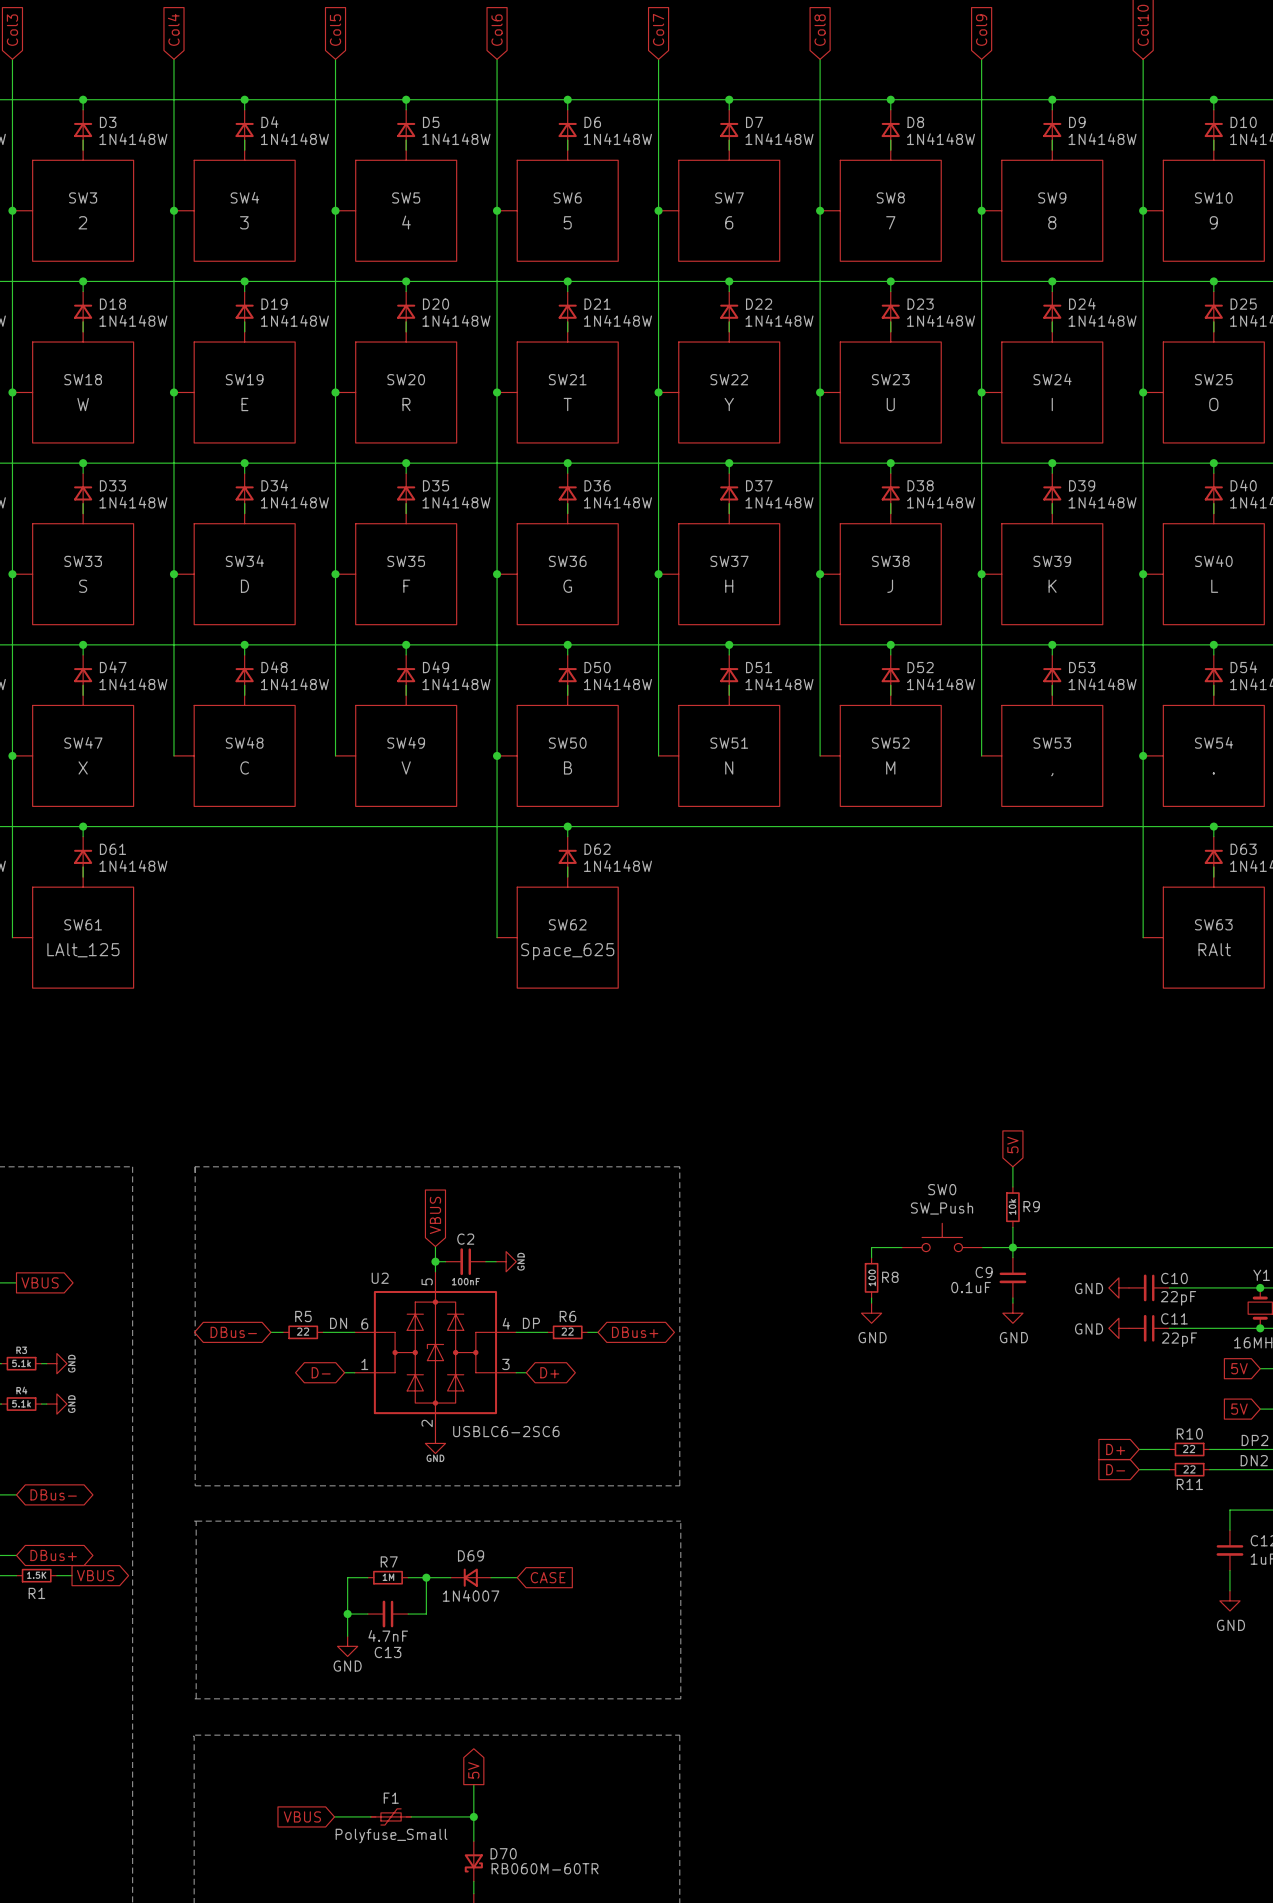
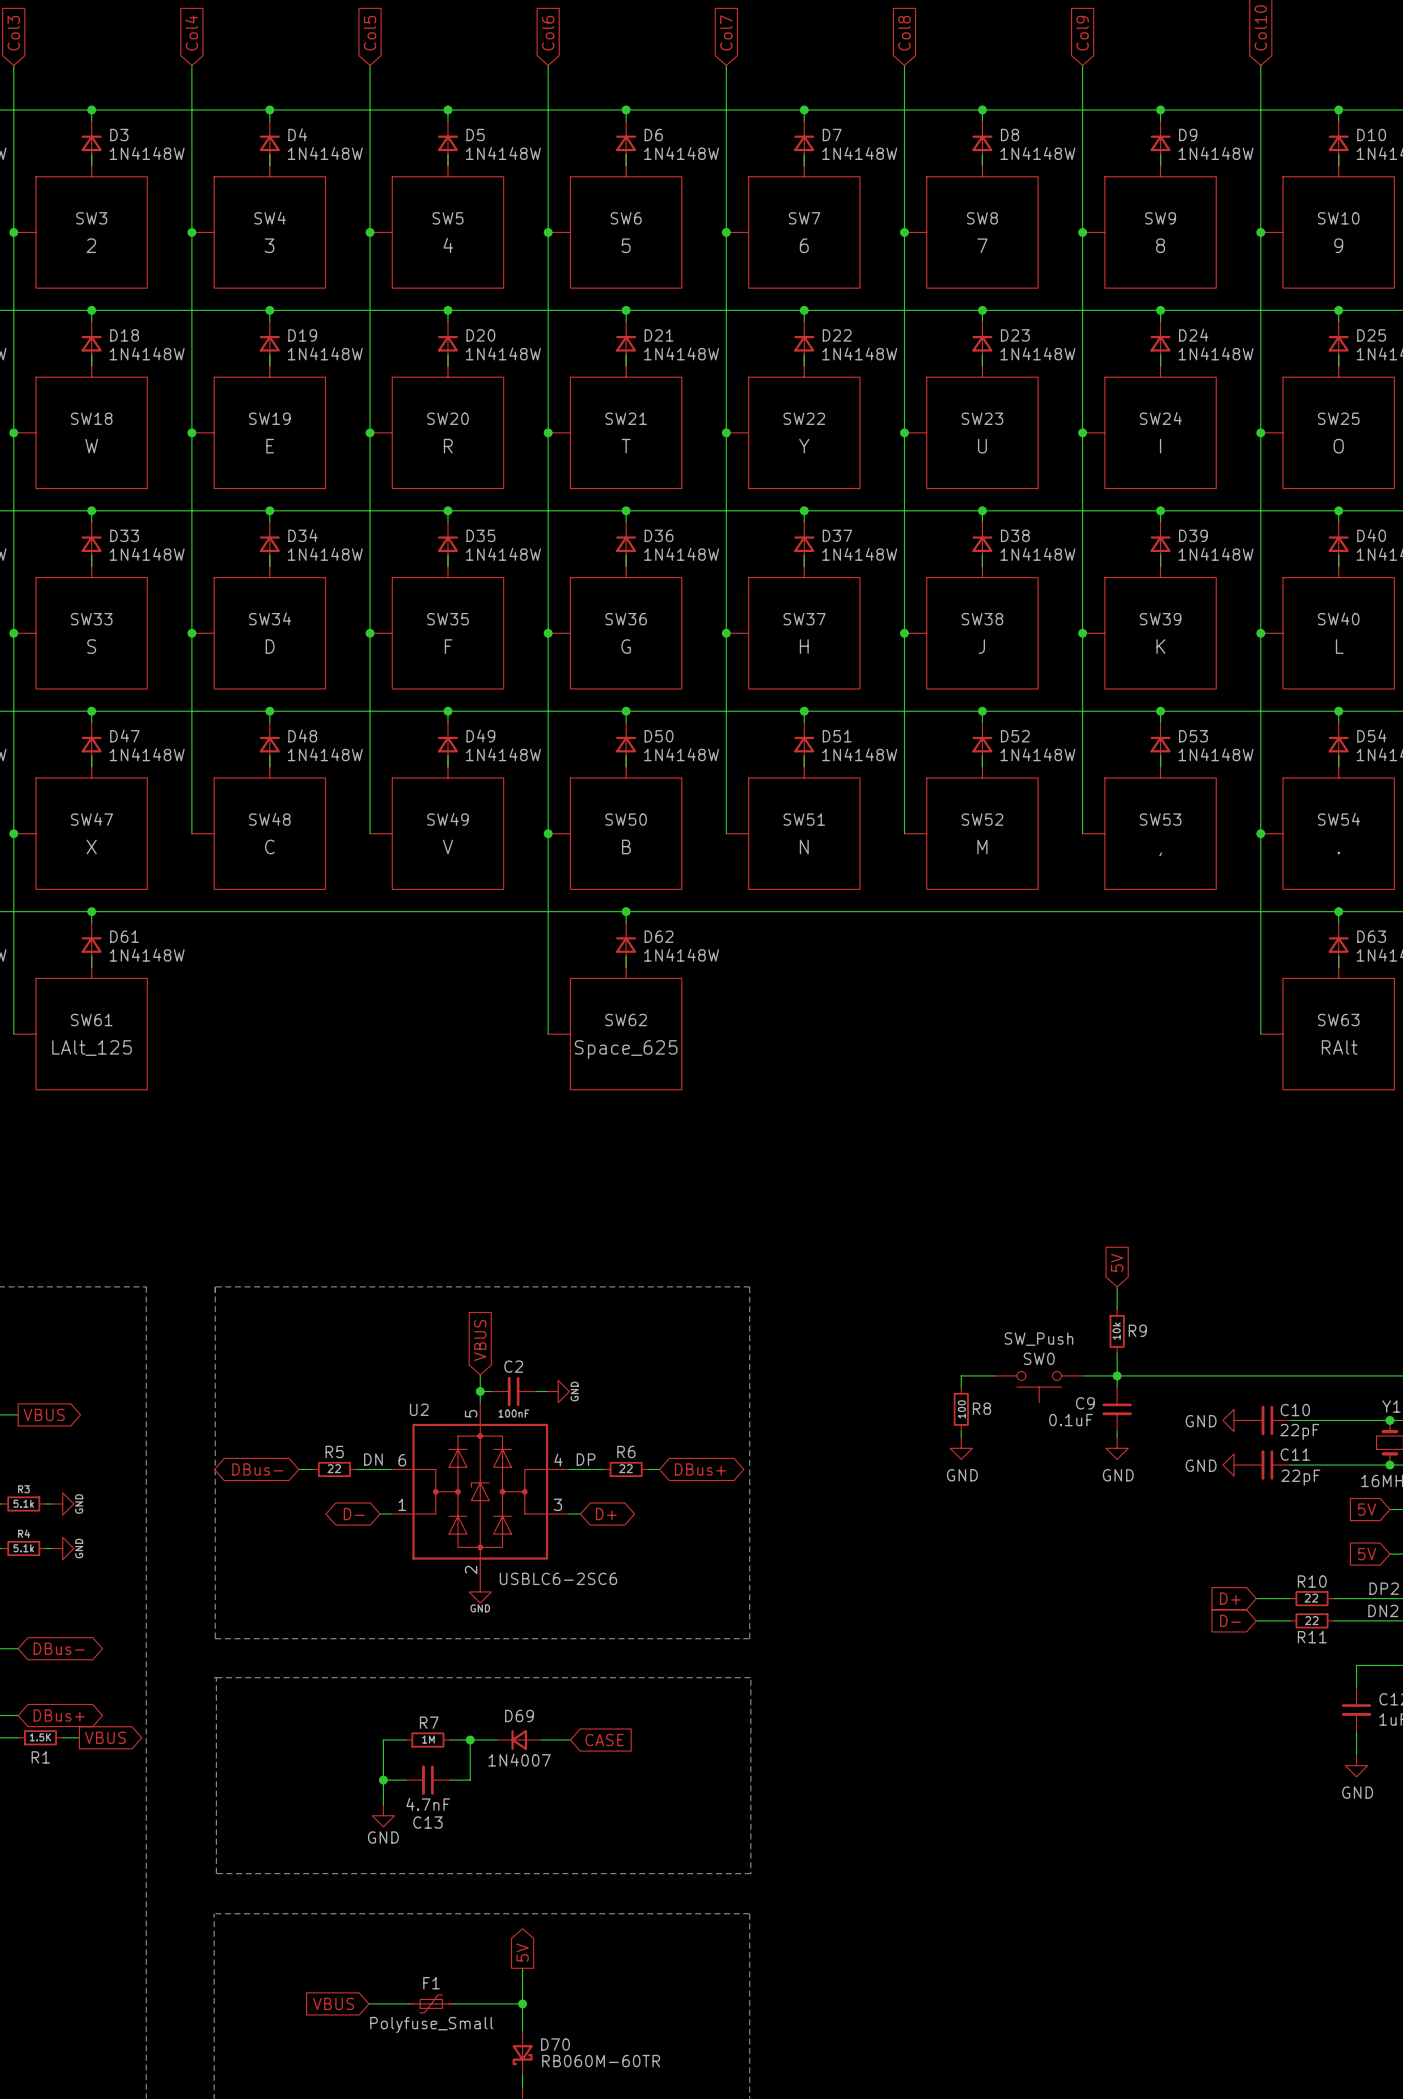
SW0 name position: SW0 (942, 1189) -> SW0 (1039, 1358)
SW0 rotation: 0° (942, 1237) -> 180° (1039, 1387)

